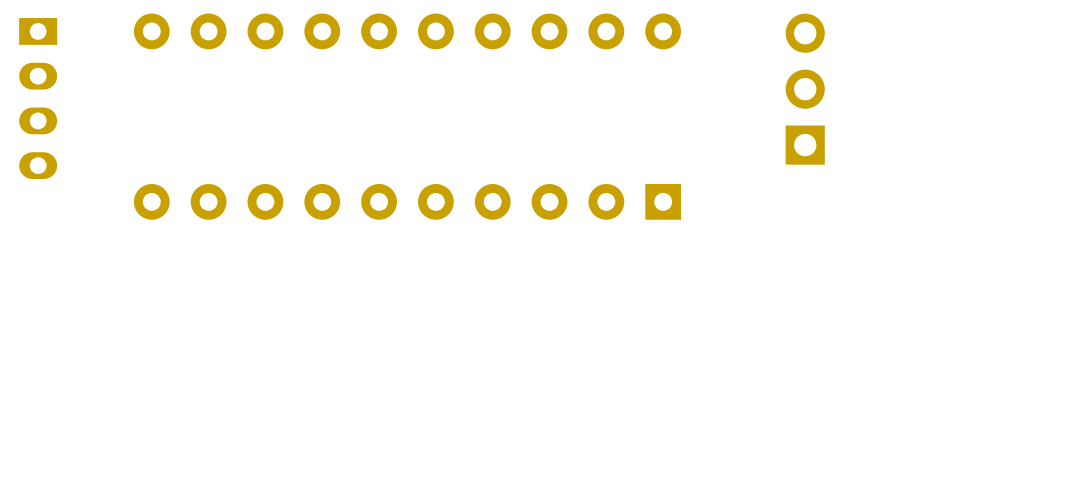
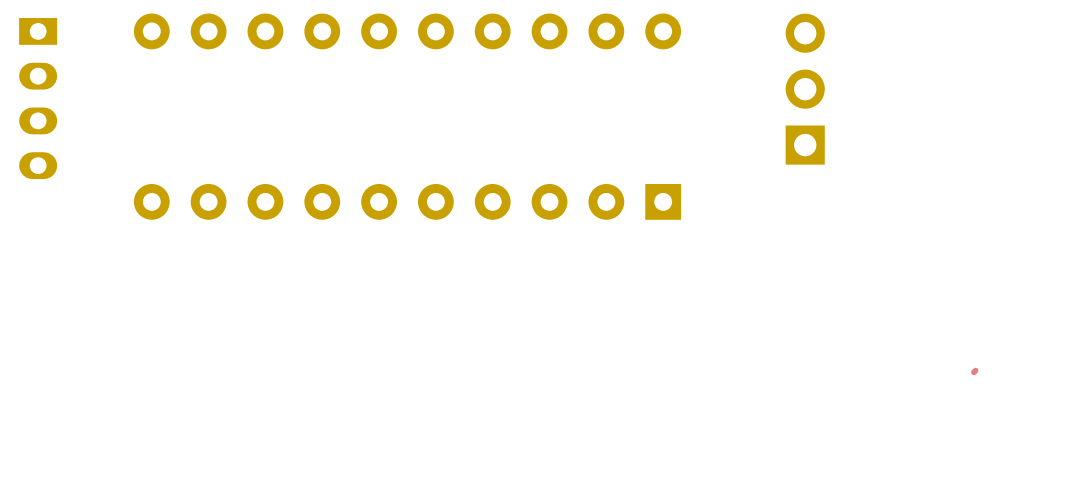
top track: none -> (975, 370) (973, 372)

